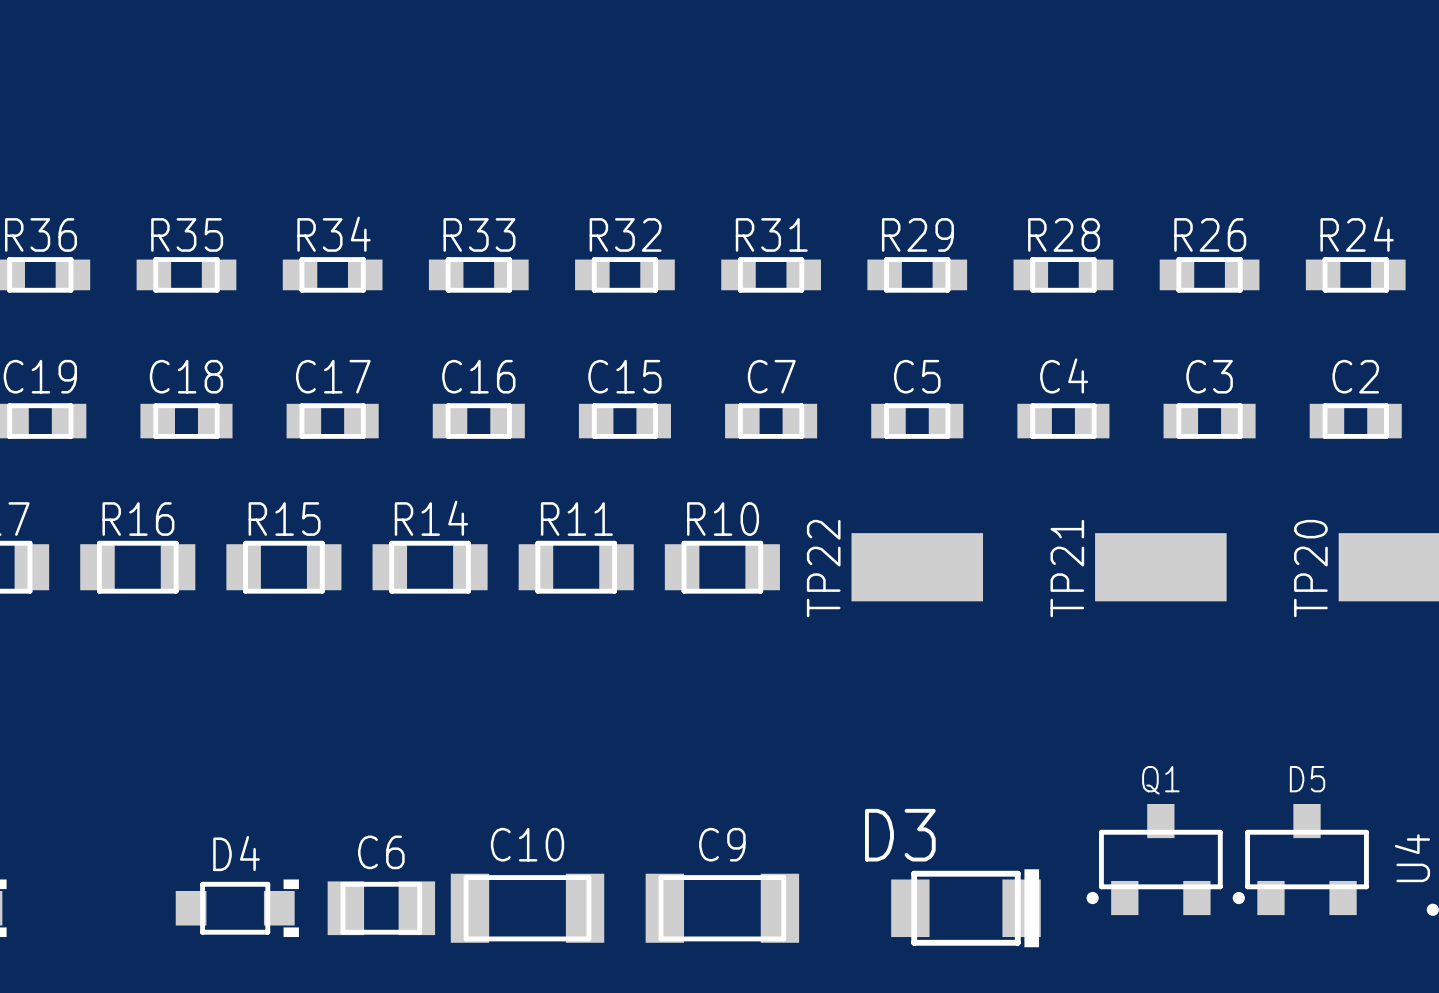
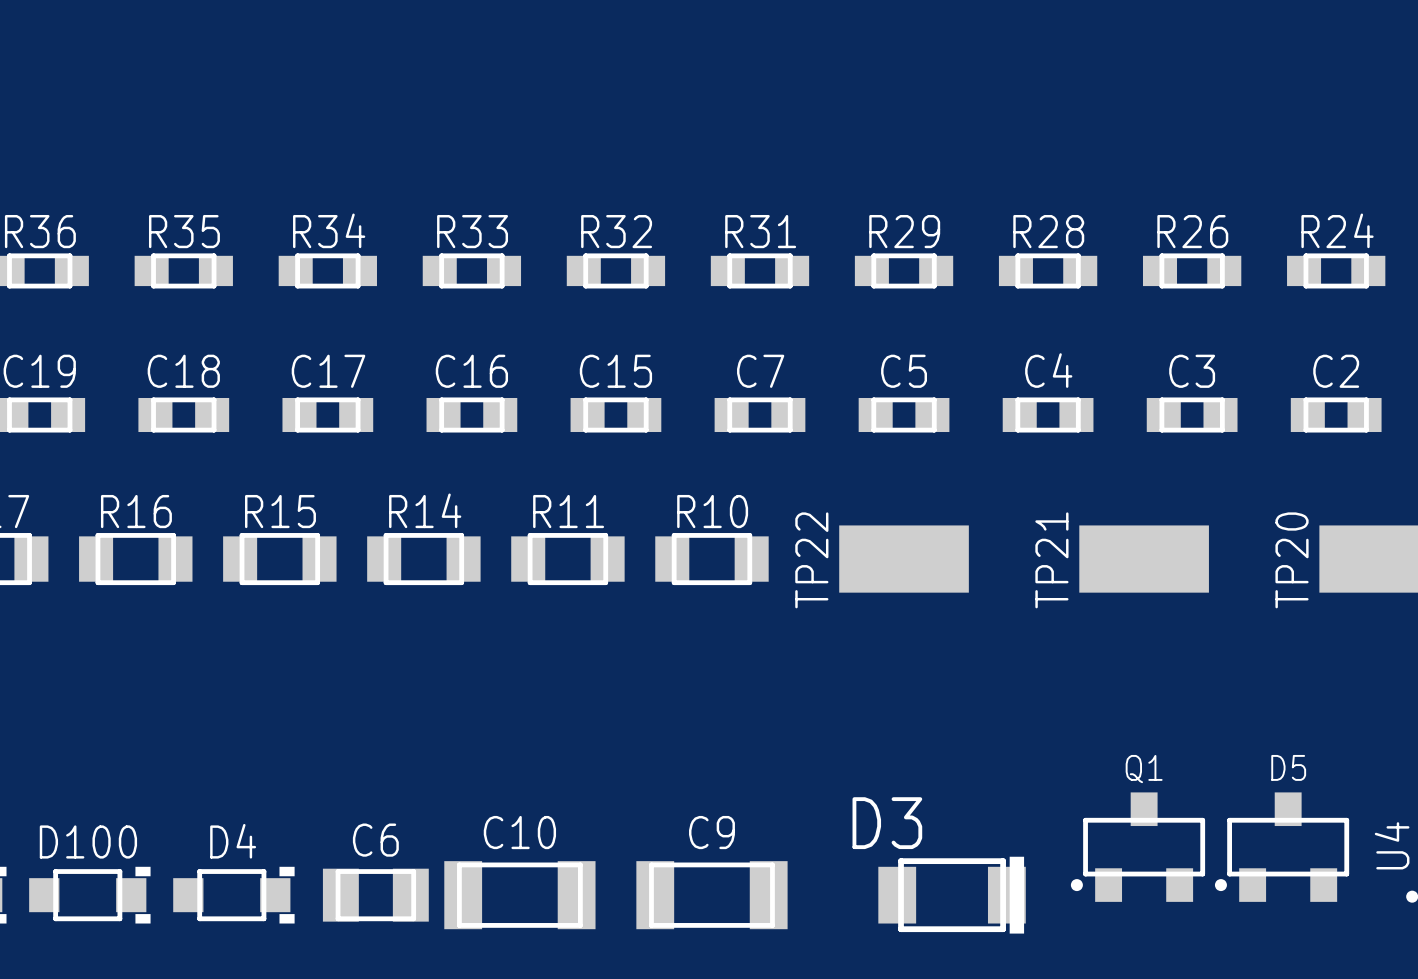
D100: none -> (89, 895)

